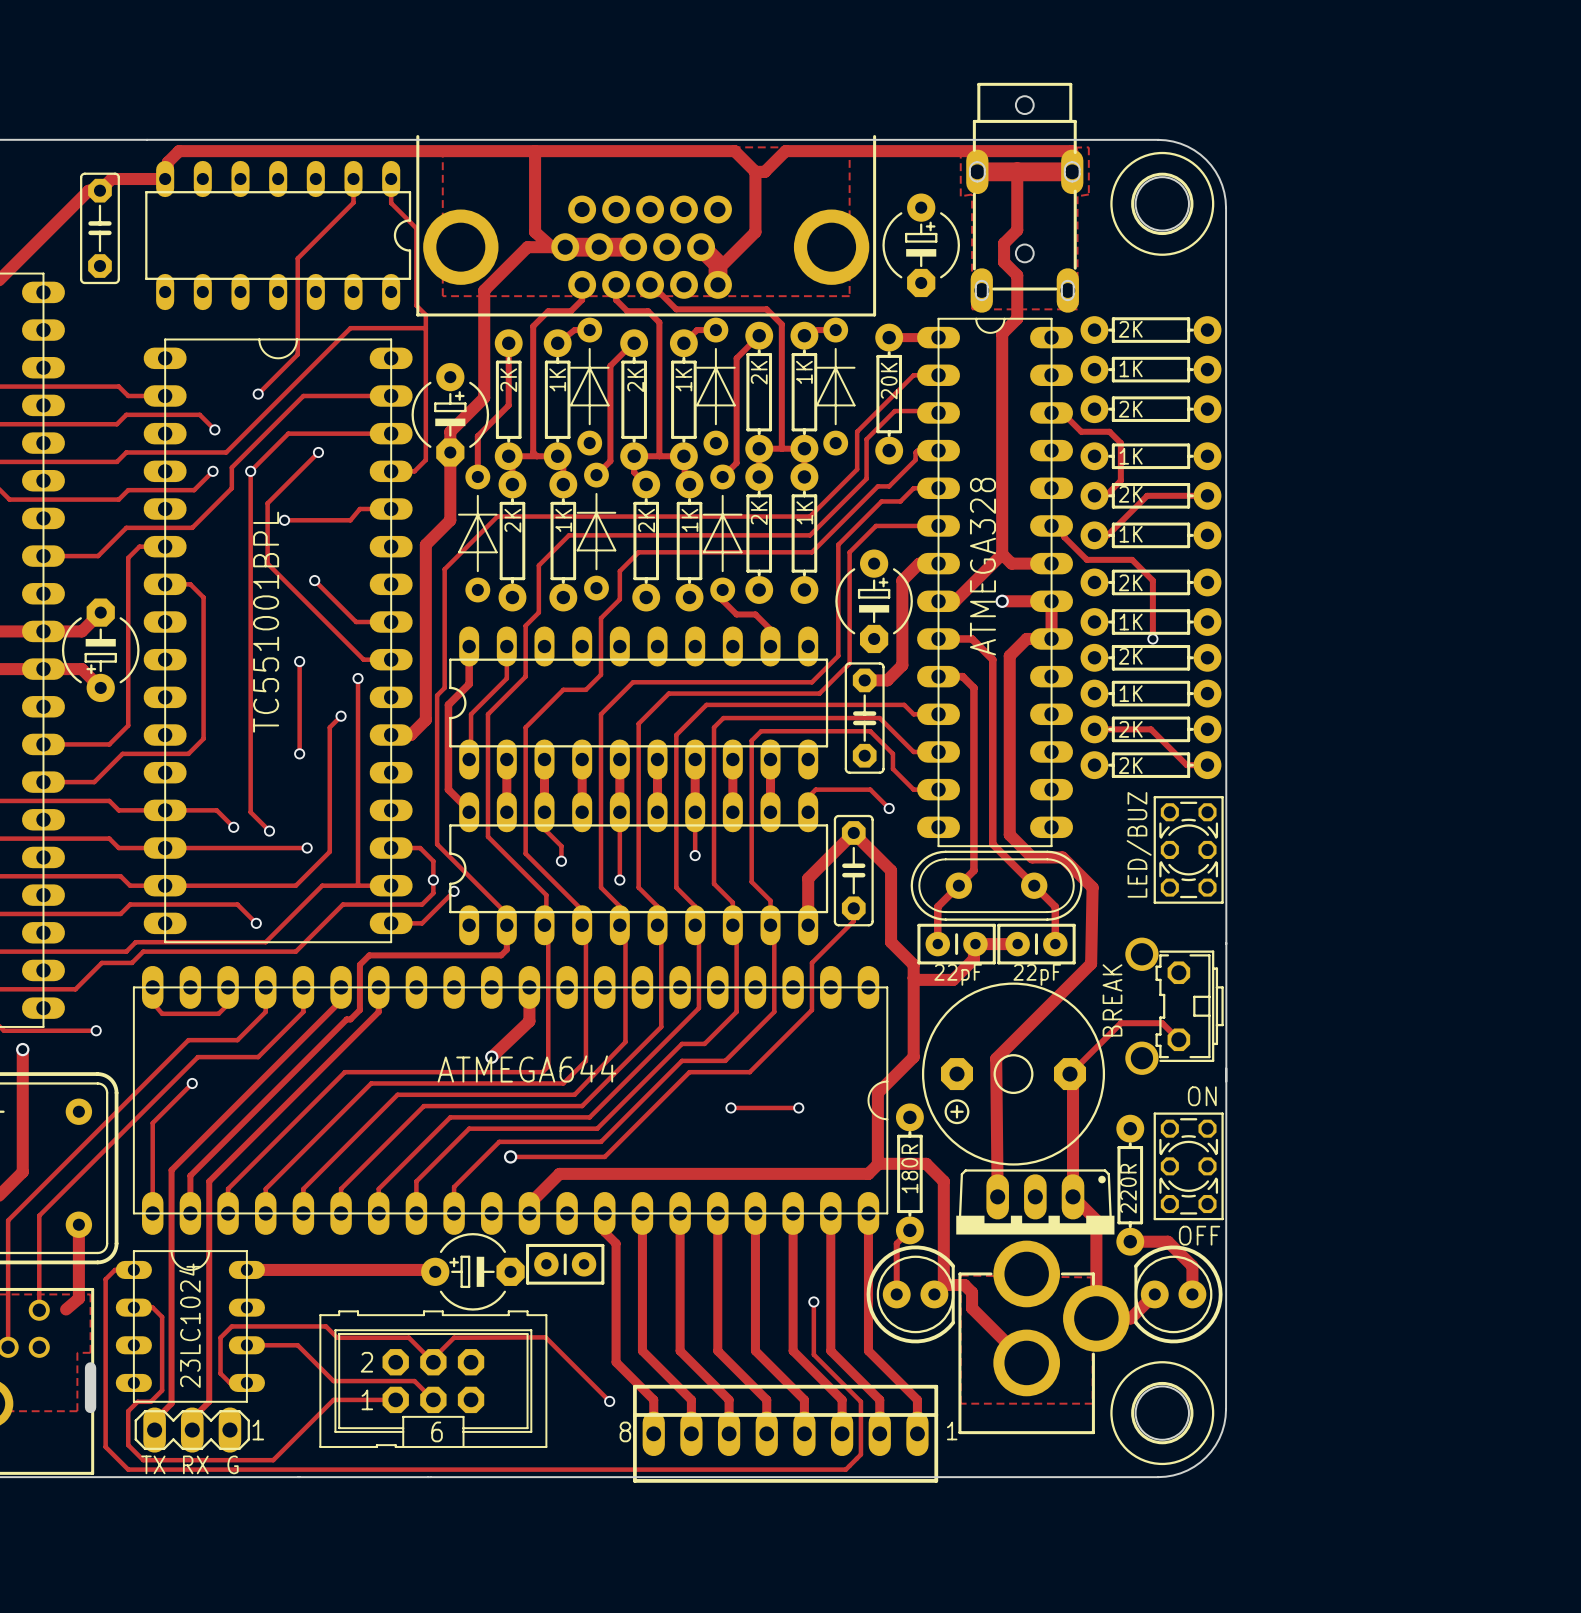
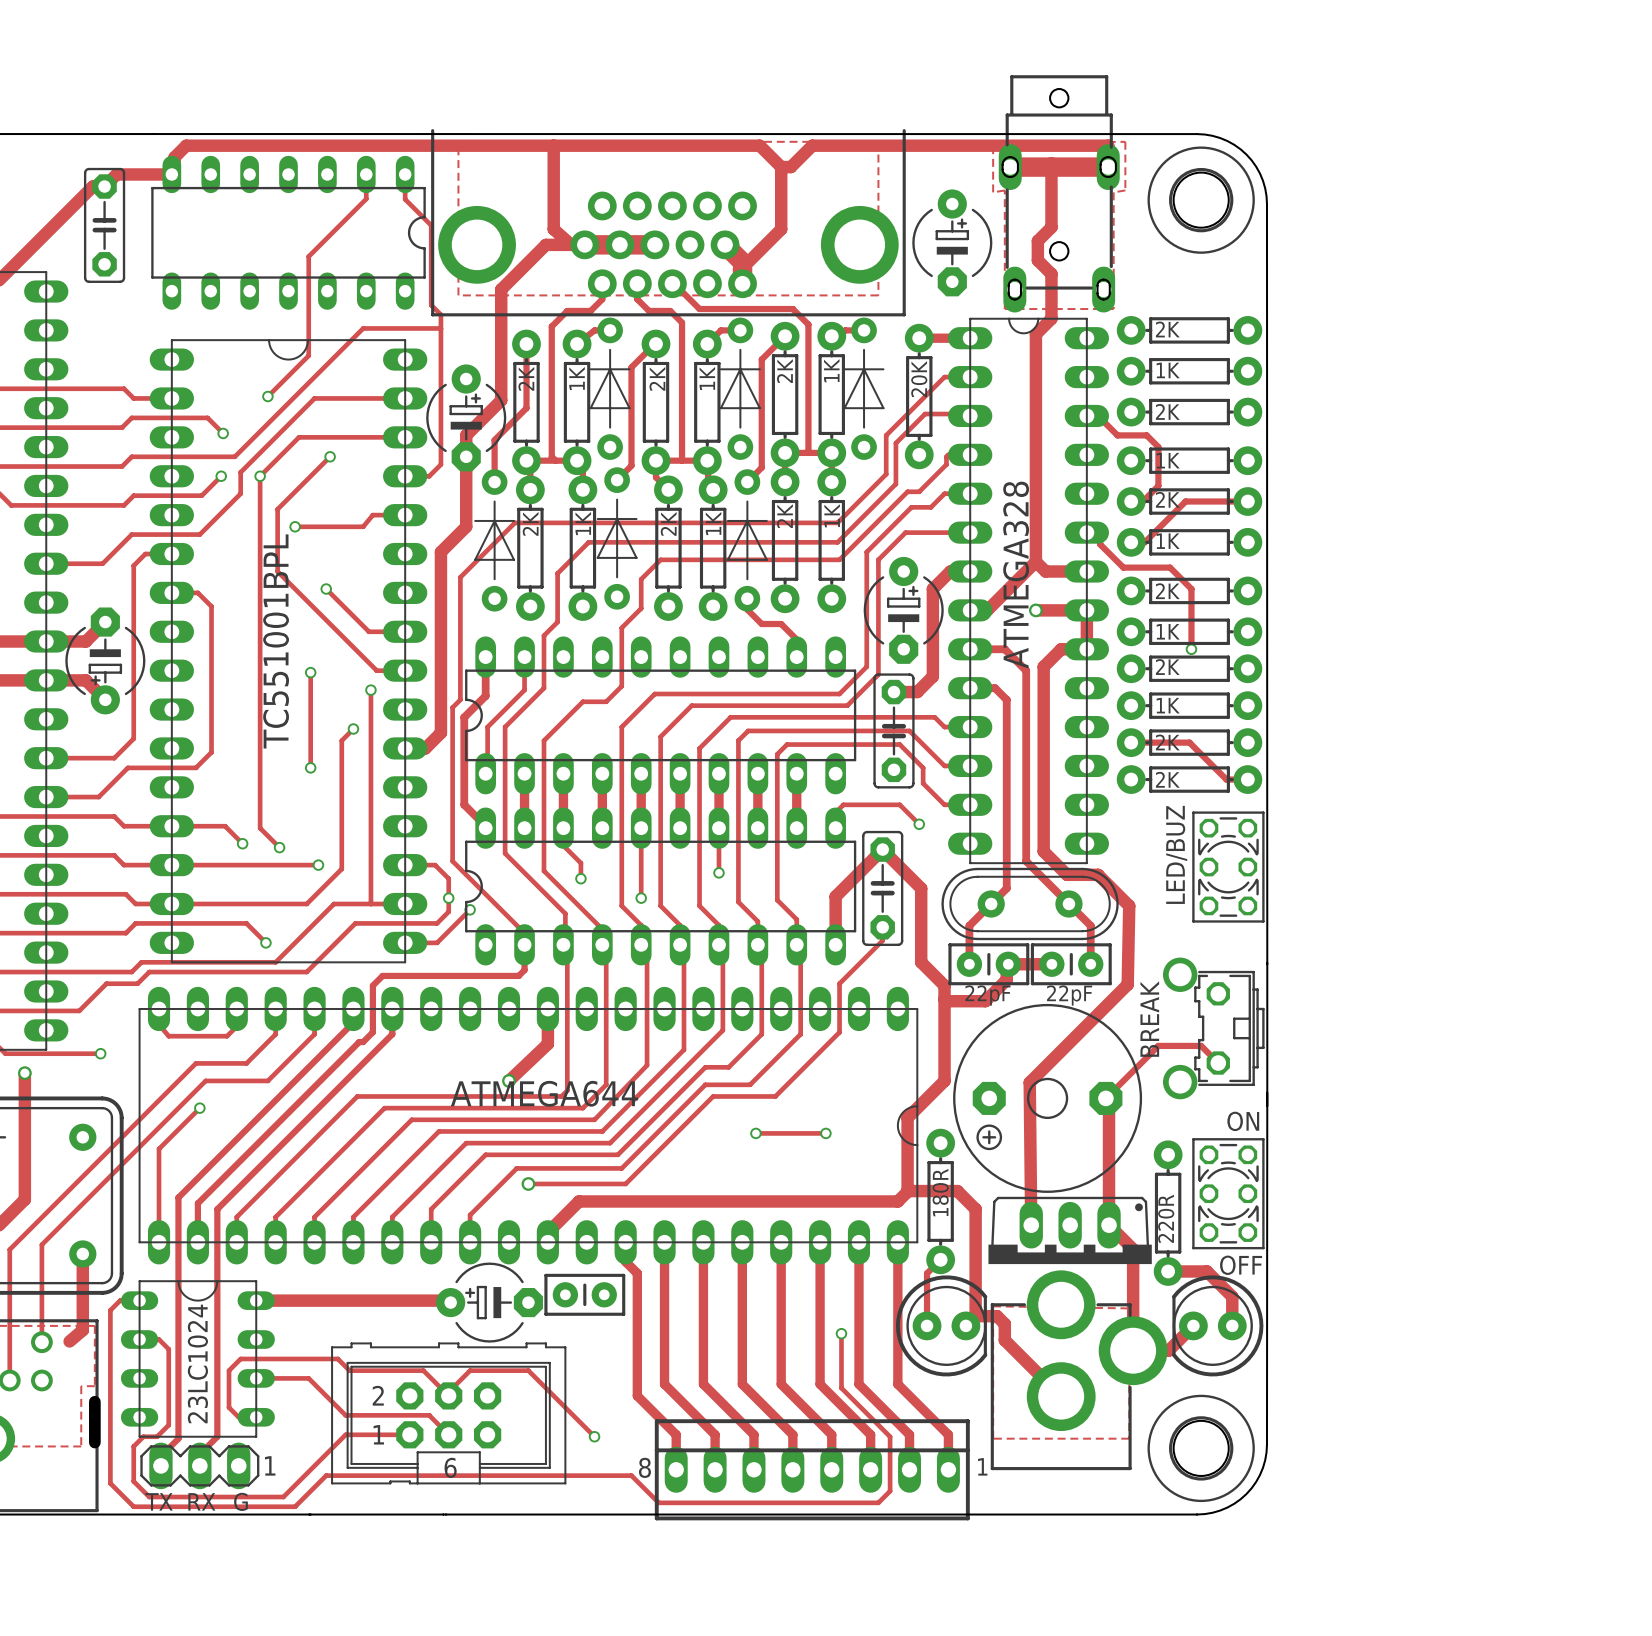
track: (454, 1337) (545, 1337) (609, 1401) -> (470, 1370) (528, 1370) (594, 1436)
via position: (609, 1401) -> (594, 1436)
track: (849, 1465) (845, 1469) (284, 1469) -> (878, 1502) (658, 1502) (631, 1475) (326, 1475) (295, 1506)

